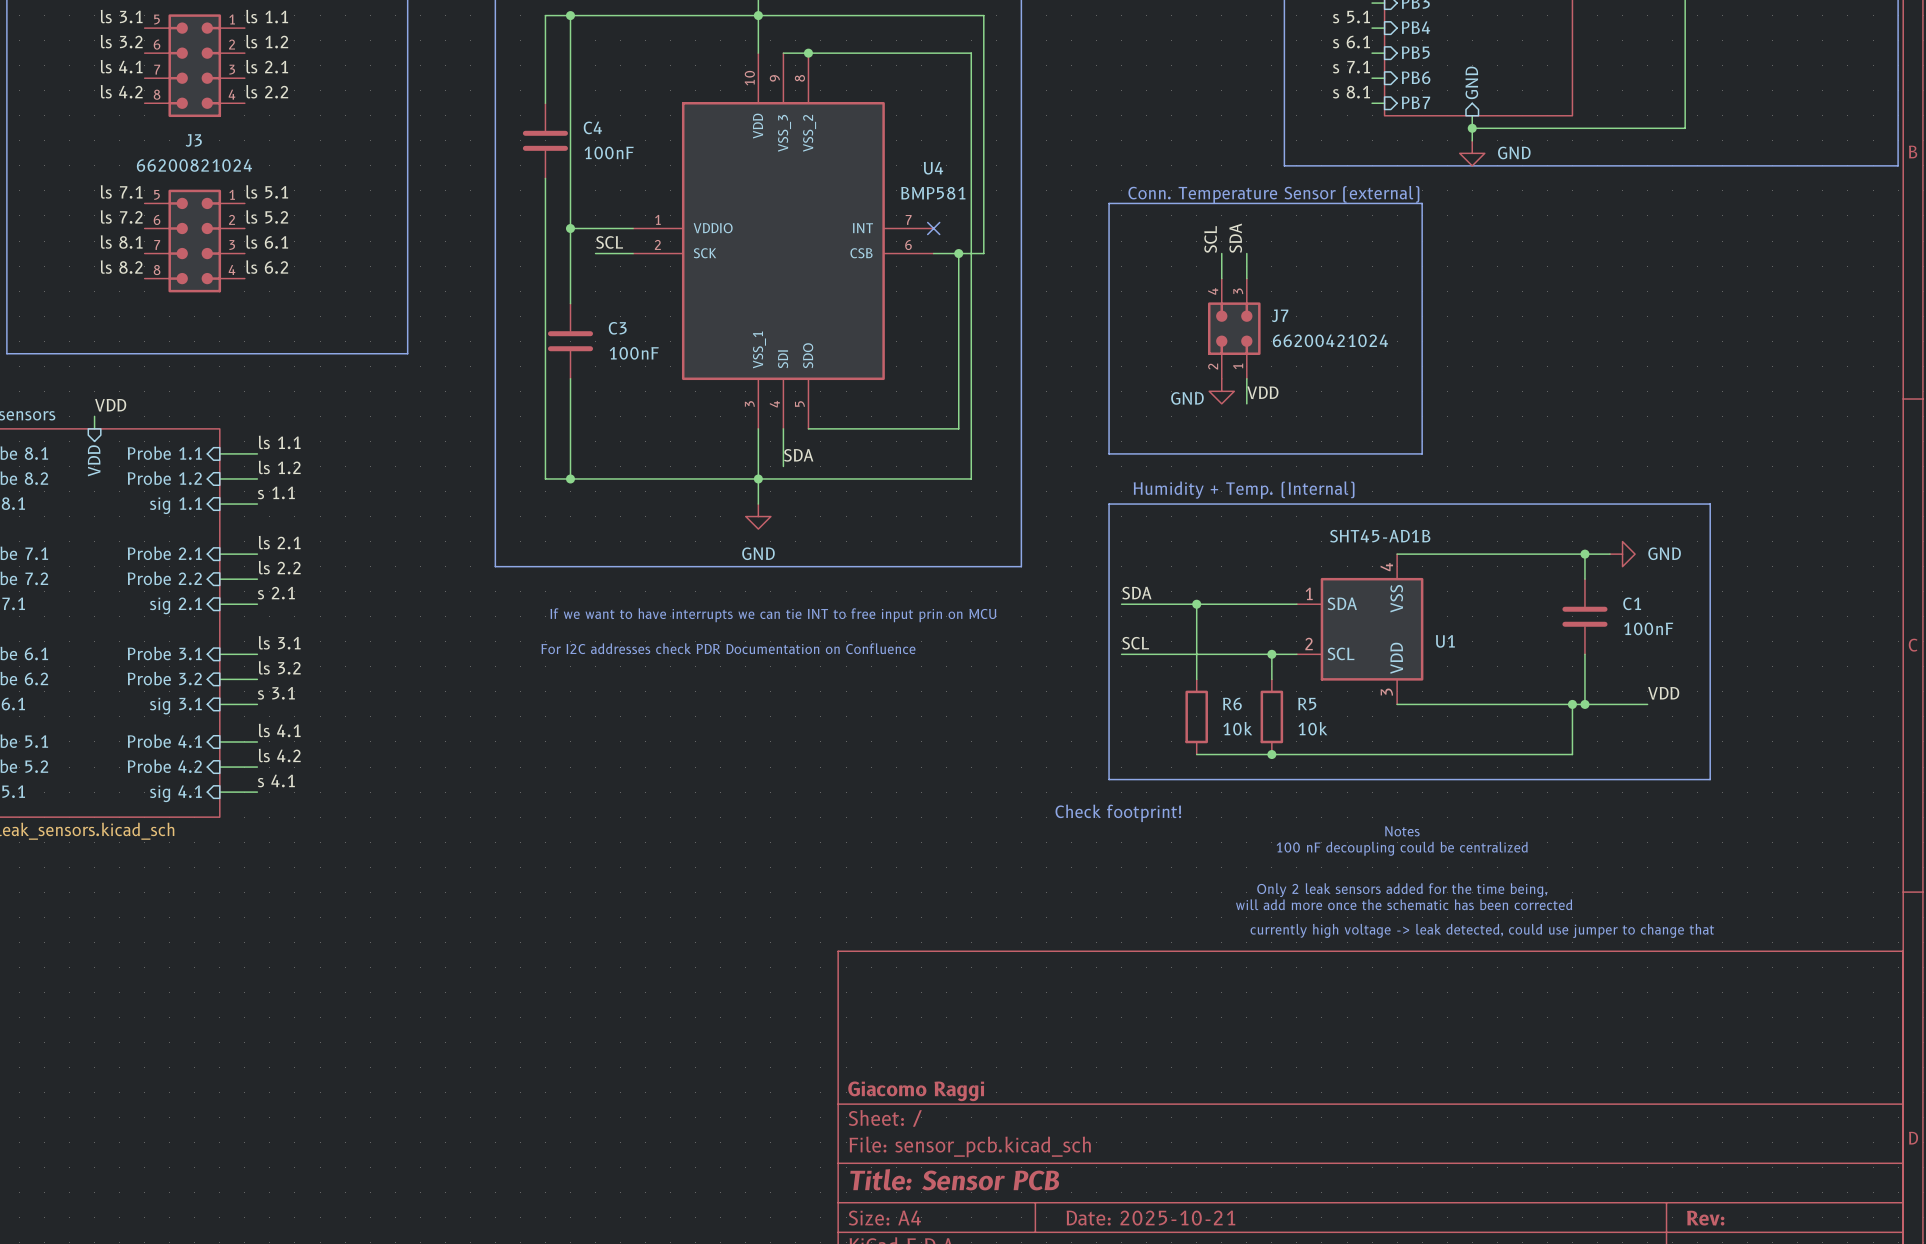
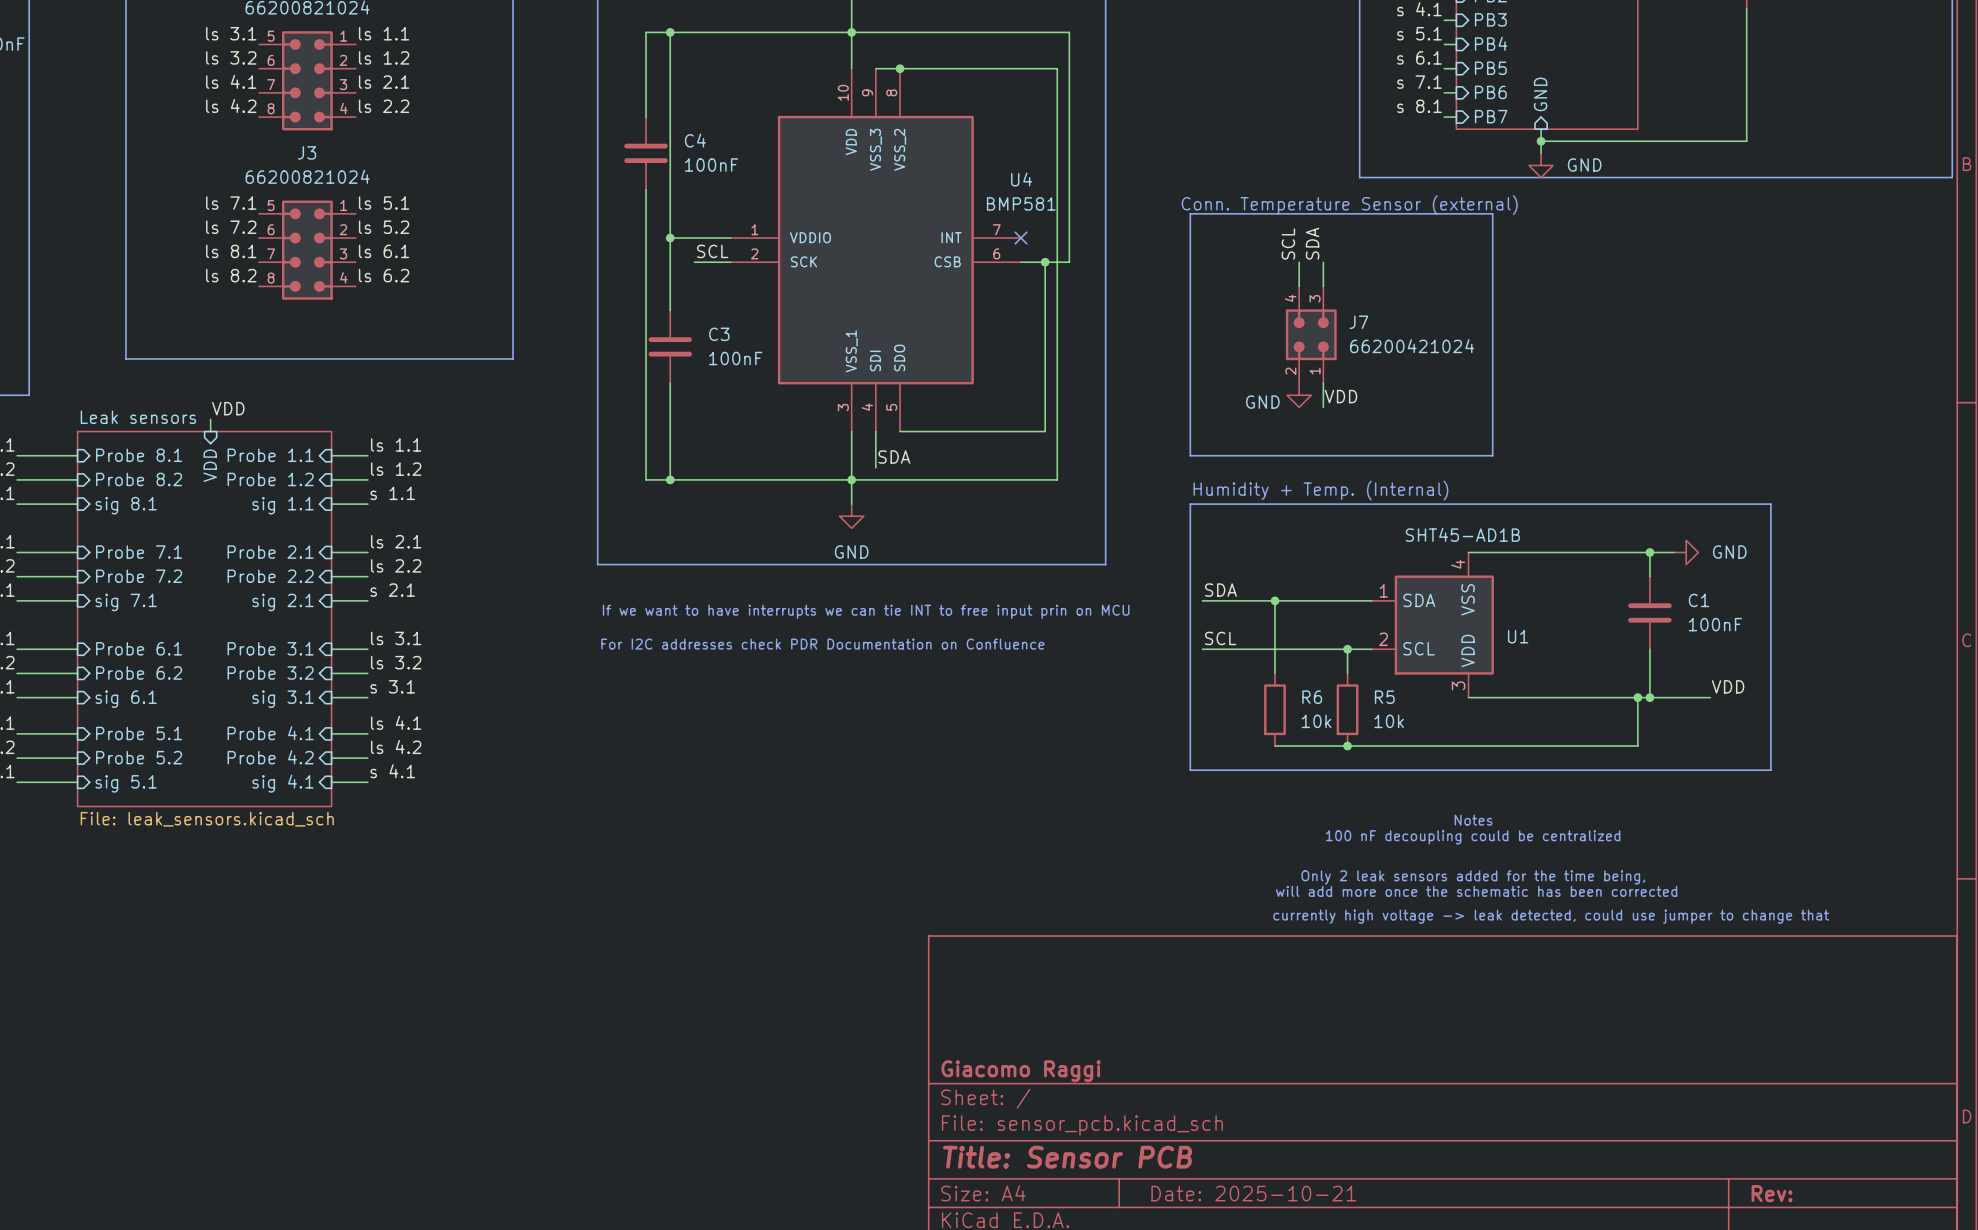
text: Check footprint! (1118, 813) -> none

